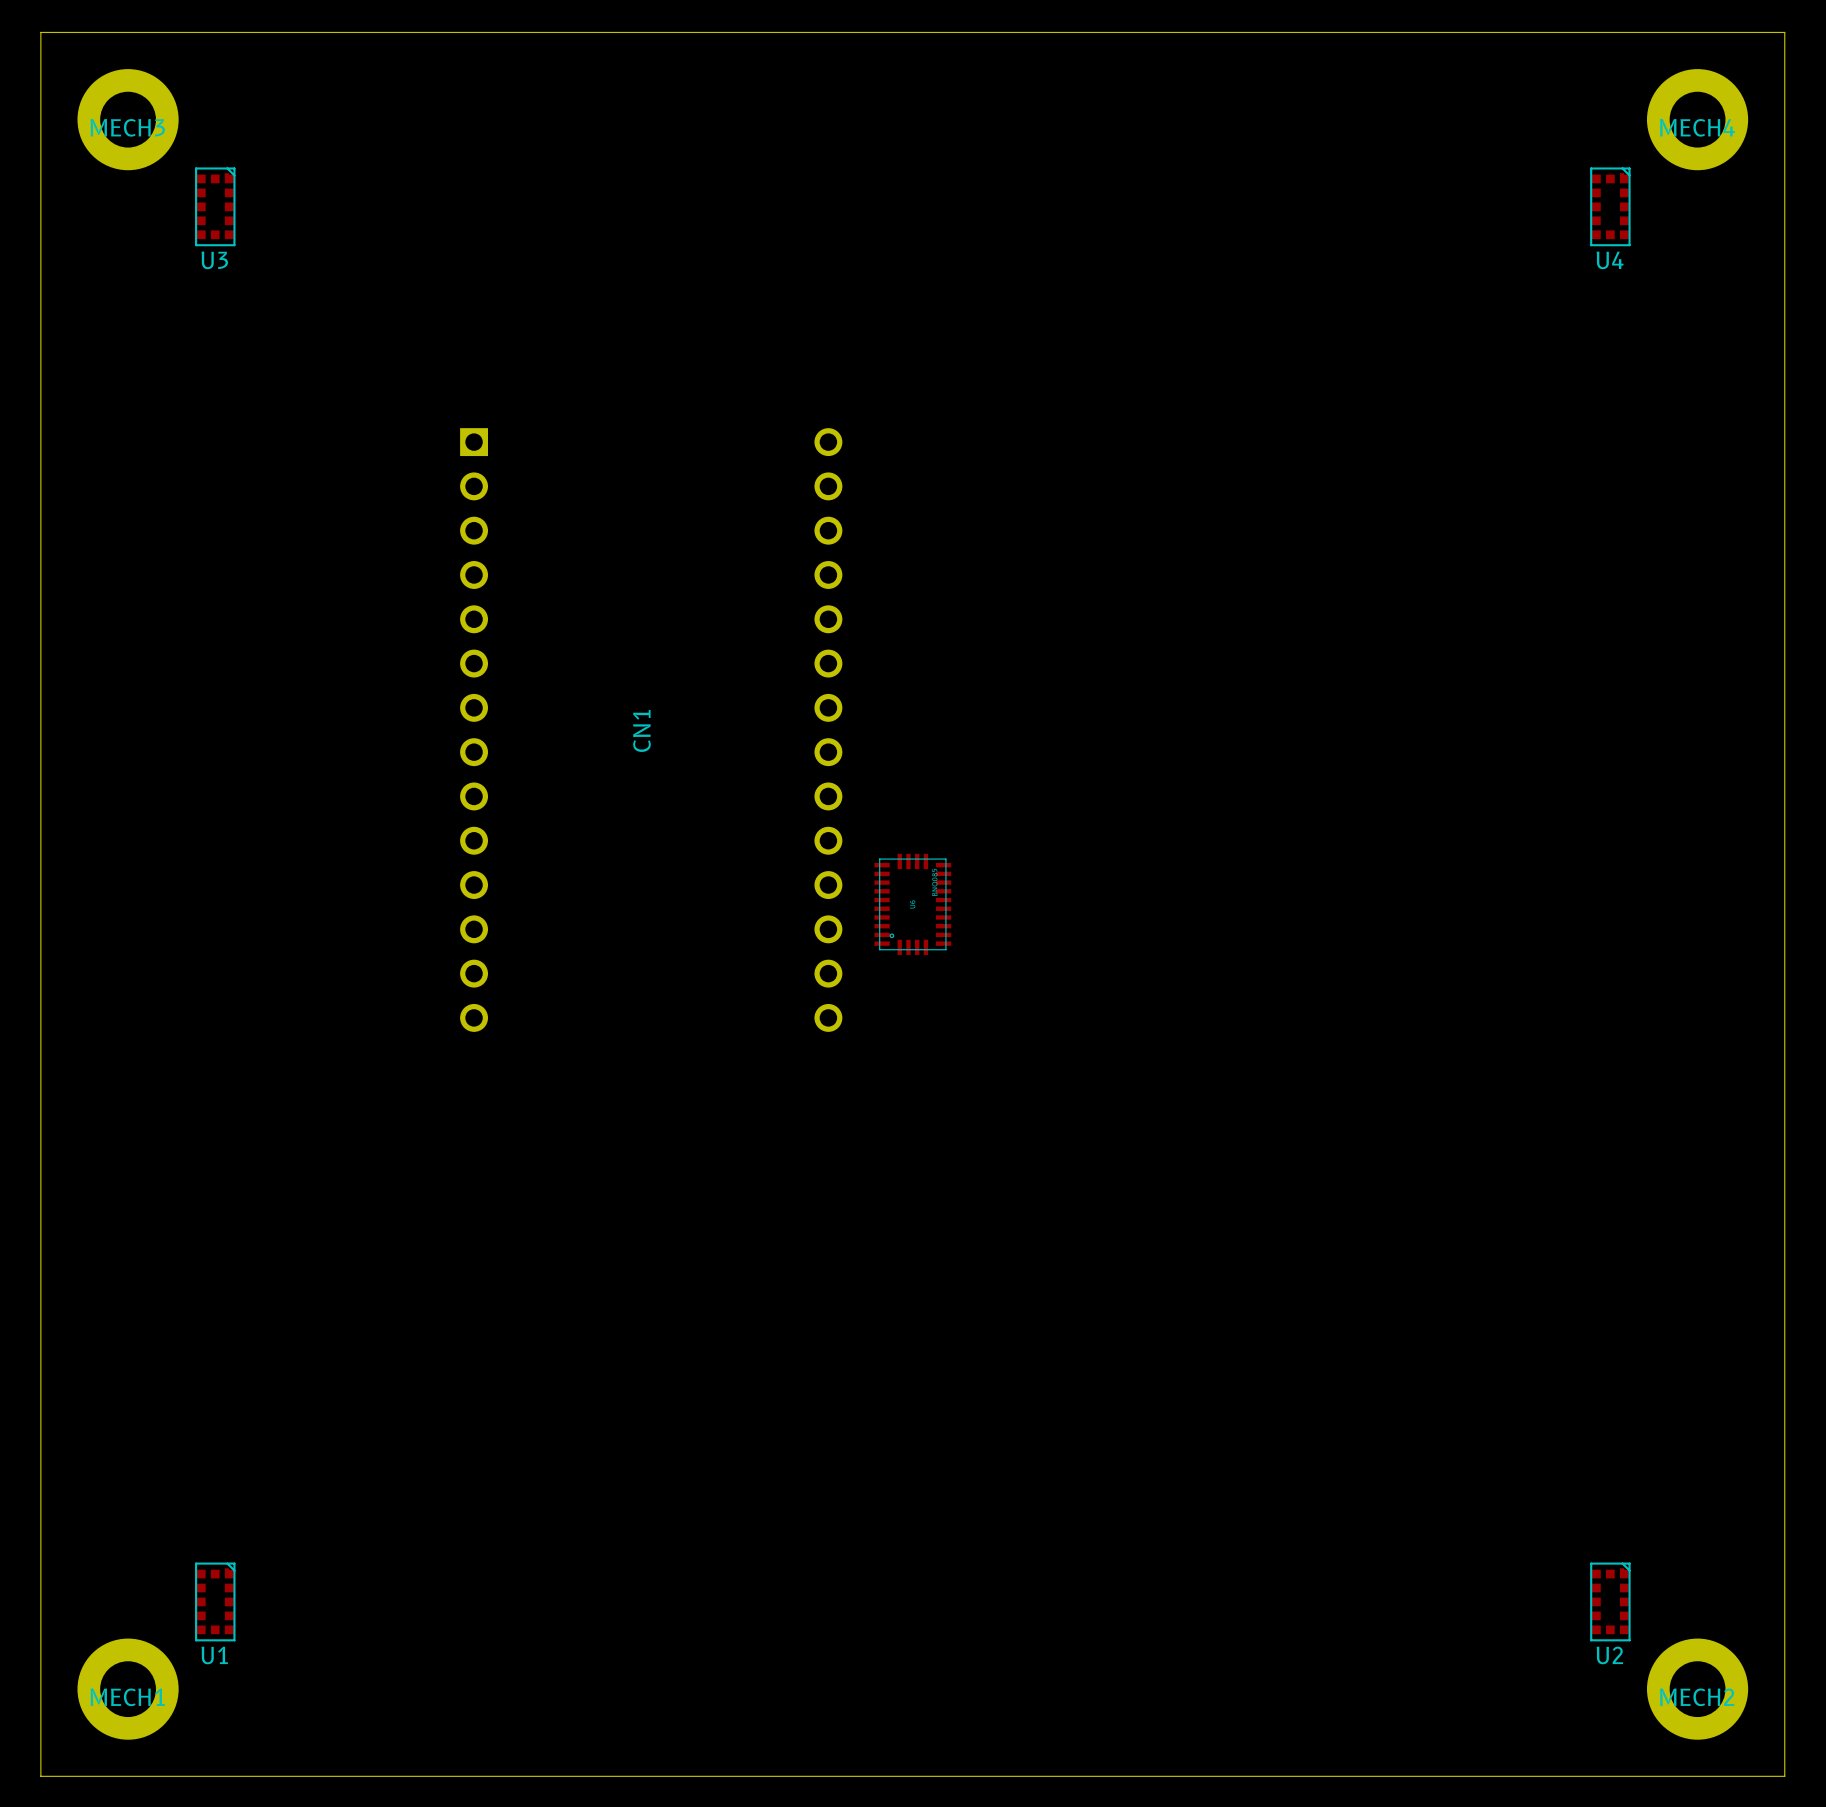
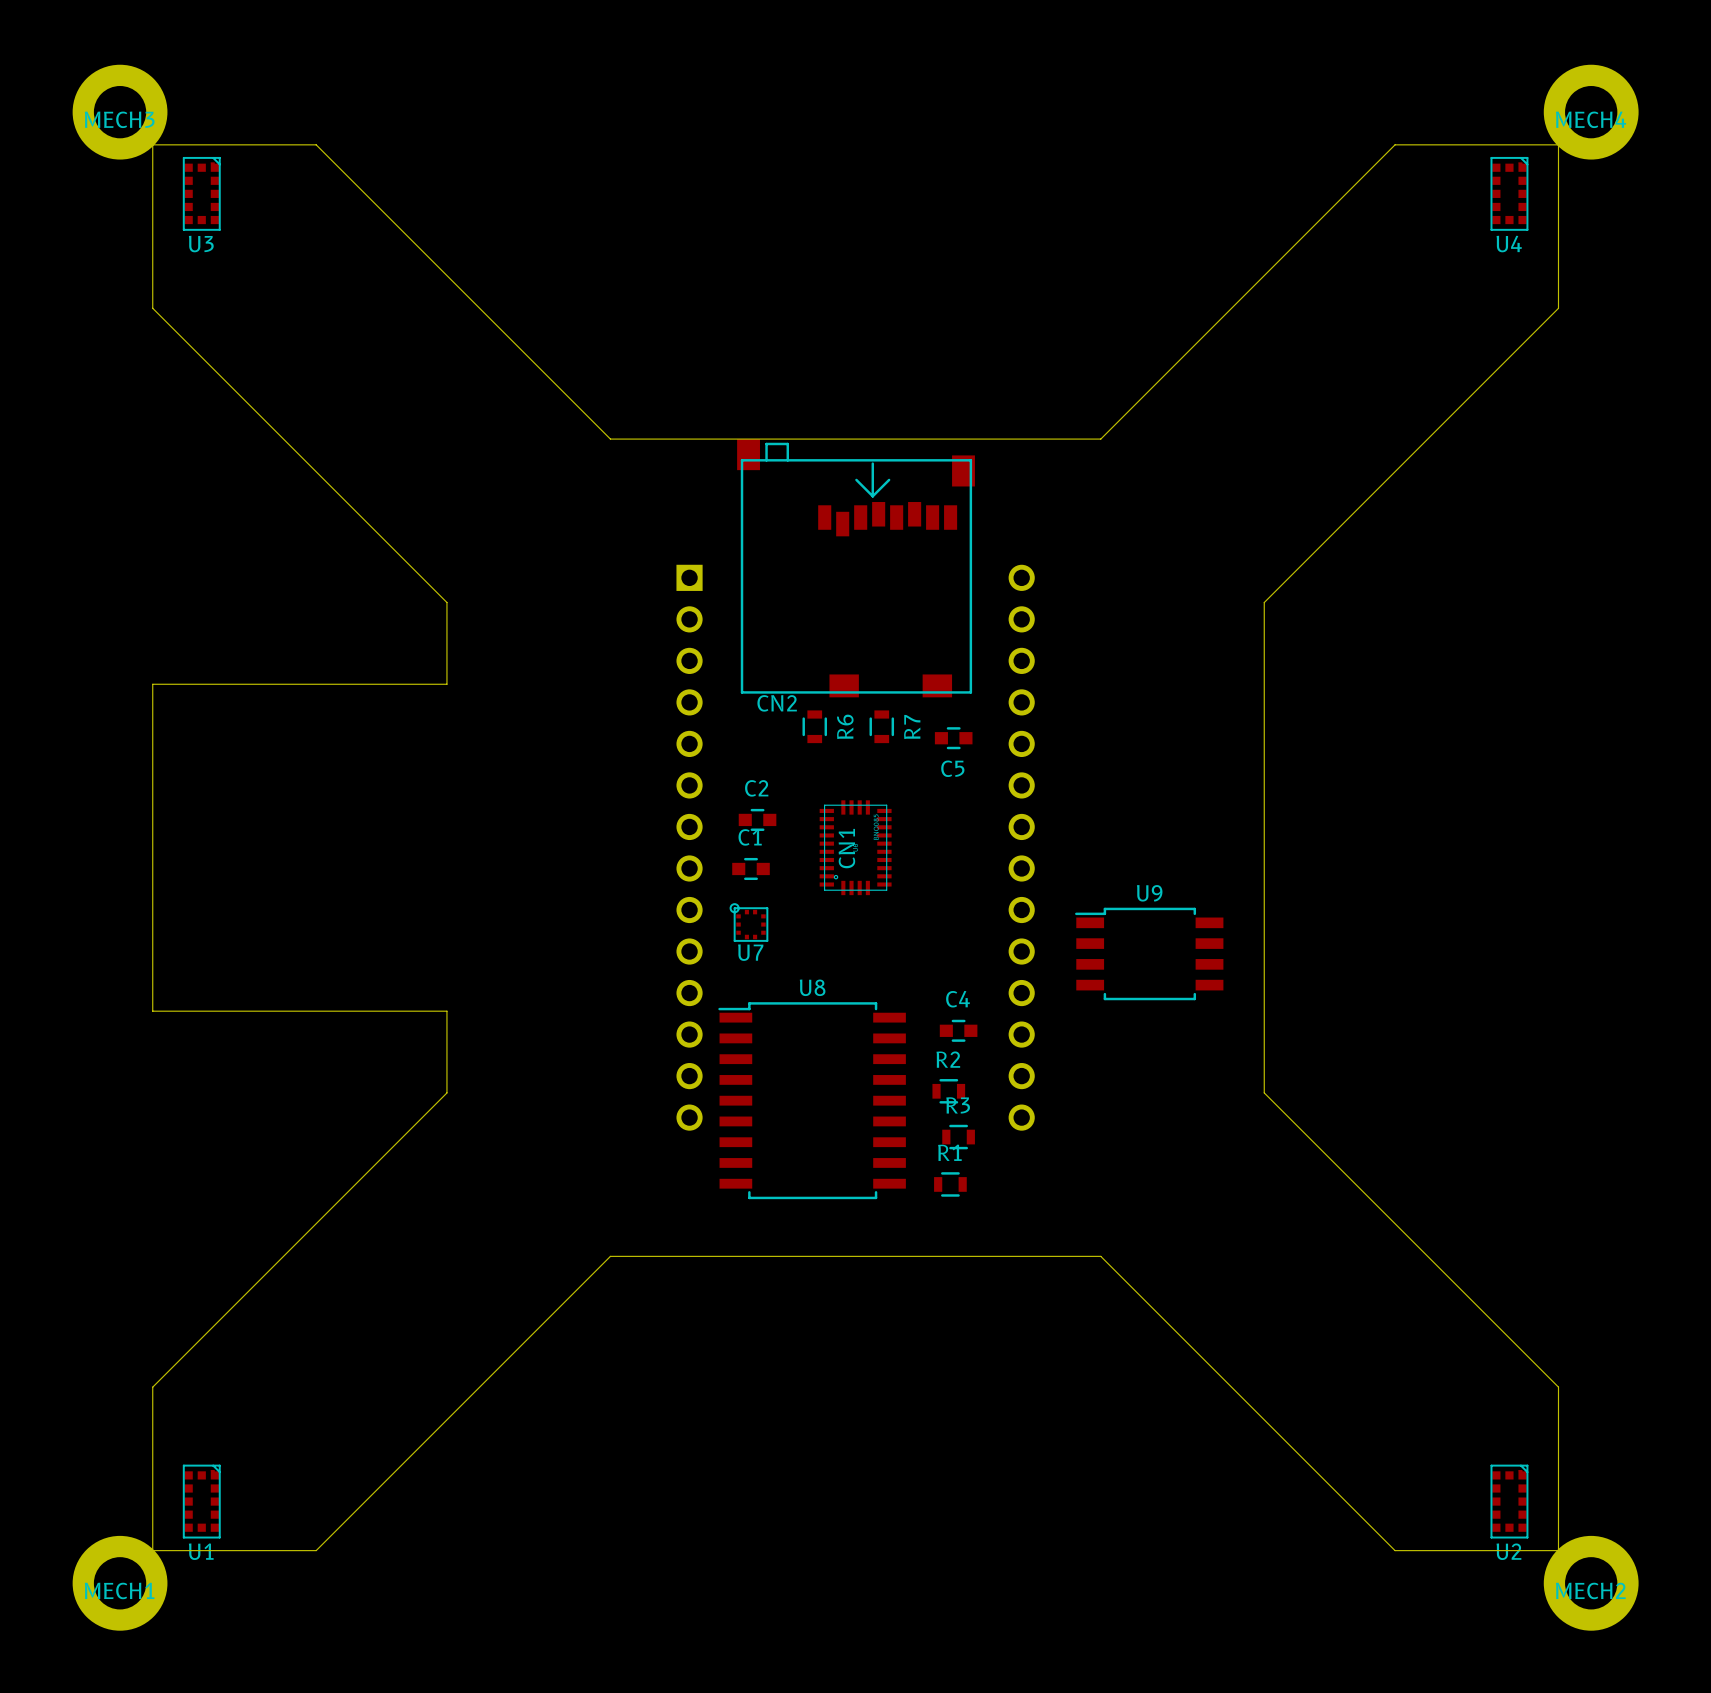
board edge: (40, 32) (40, 1776) (1784, 1776) (1784, 32) (40, 32) -> (152, 144) (152, 308) (446, 602) (446, 684) (152, 684) (152, 1011) (446, 1011) (446, 1092) (152, 1387) (152, 1550) (316, 1550) (610, 1256) (1100, 1256) (1395, 1550) (1558, 1550) (1558, 1387) (1264, 1092) (1264, 602) (1558, 308) (1558, 144) (1395, 144) (1100, 439) (610, 439) (316, 144) (152, 144)
CN2: none -> (856, 568)
CN1 position: (651, 730) -> (855, 847)
R6: none -> (814, 726)
R7: none -> (881, 726)
C5: none -> (953, 738)
C2: none -> (757, 819)
C1: none -> (751, 868)
U7: none -> (748, 922)
U9: none -> (1149, 953)
C4: none -> (958, 1030)
R2: none -> (948, 1091)
U8: none -> (812, 1100)
R3: none -> (958, 1137)
R1: none -> (950, 1184)

